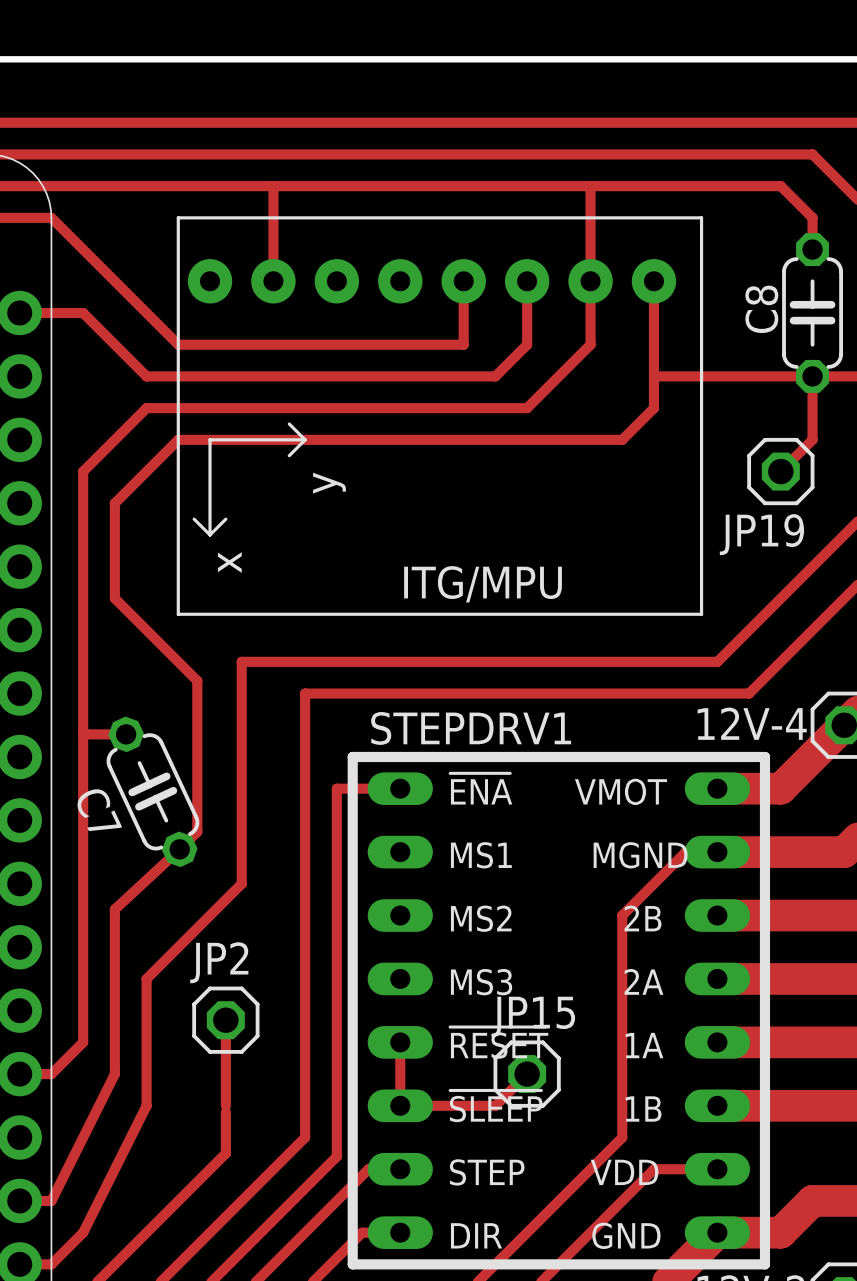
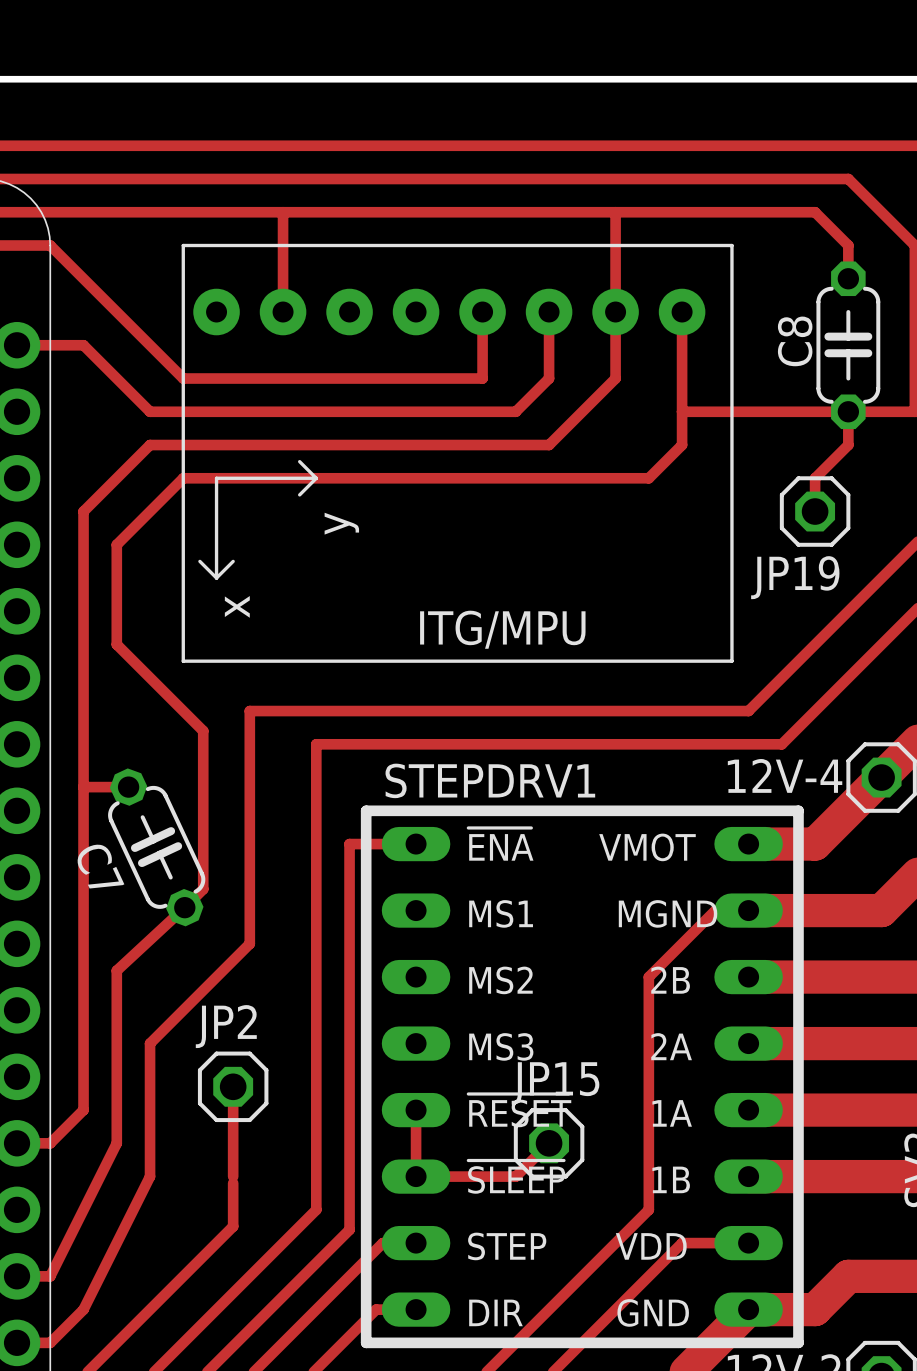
track: (812, 408) (812, 439) (780, 471) -> (848, 445) (815, 478) (815, 511)

